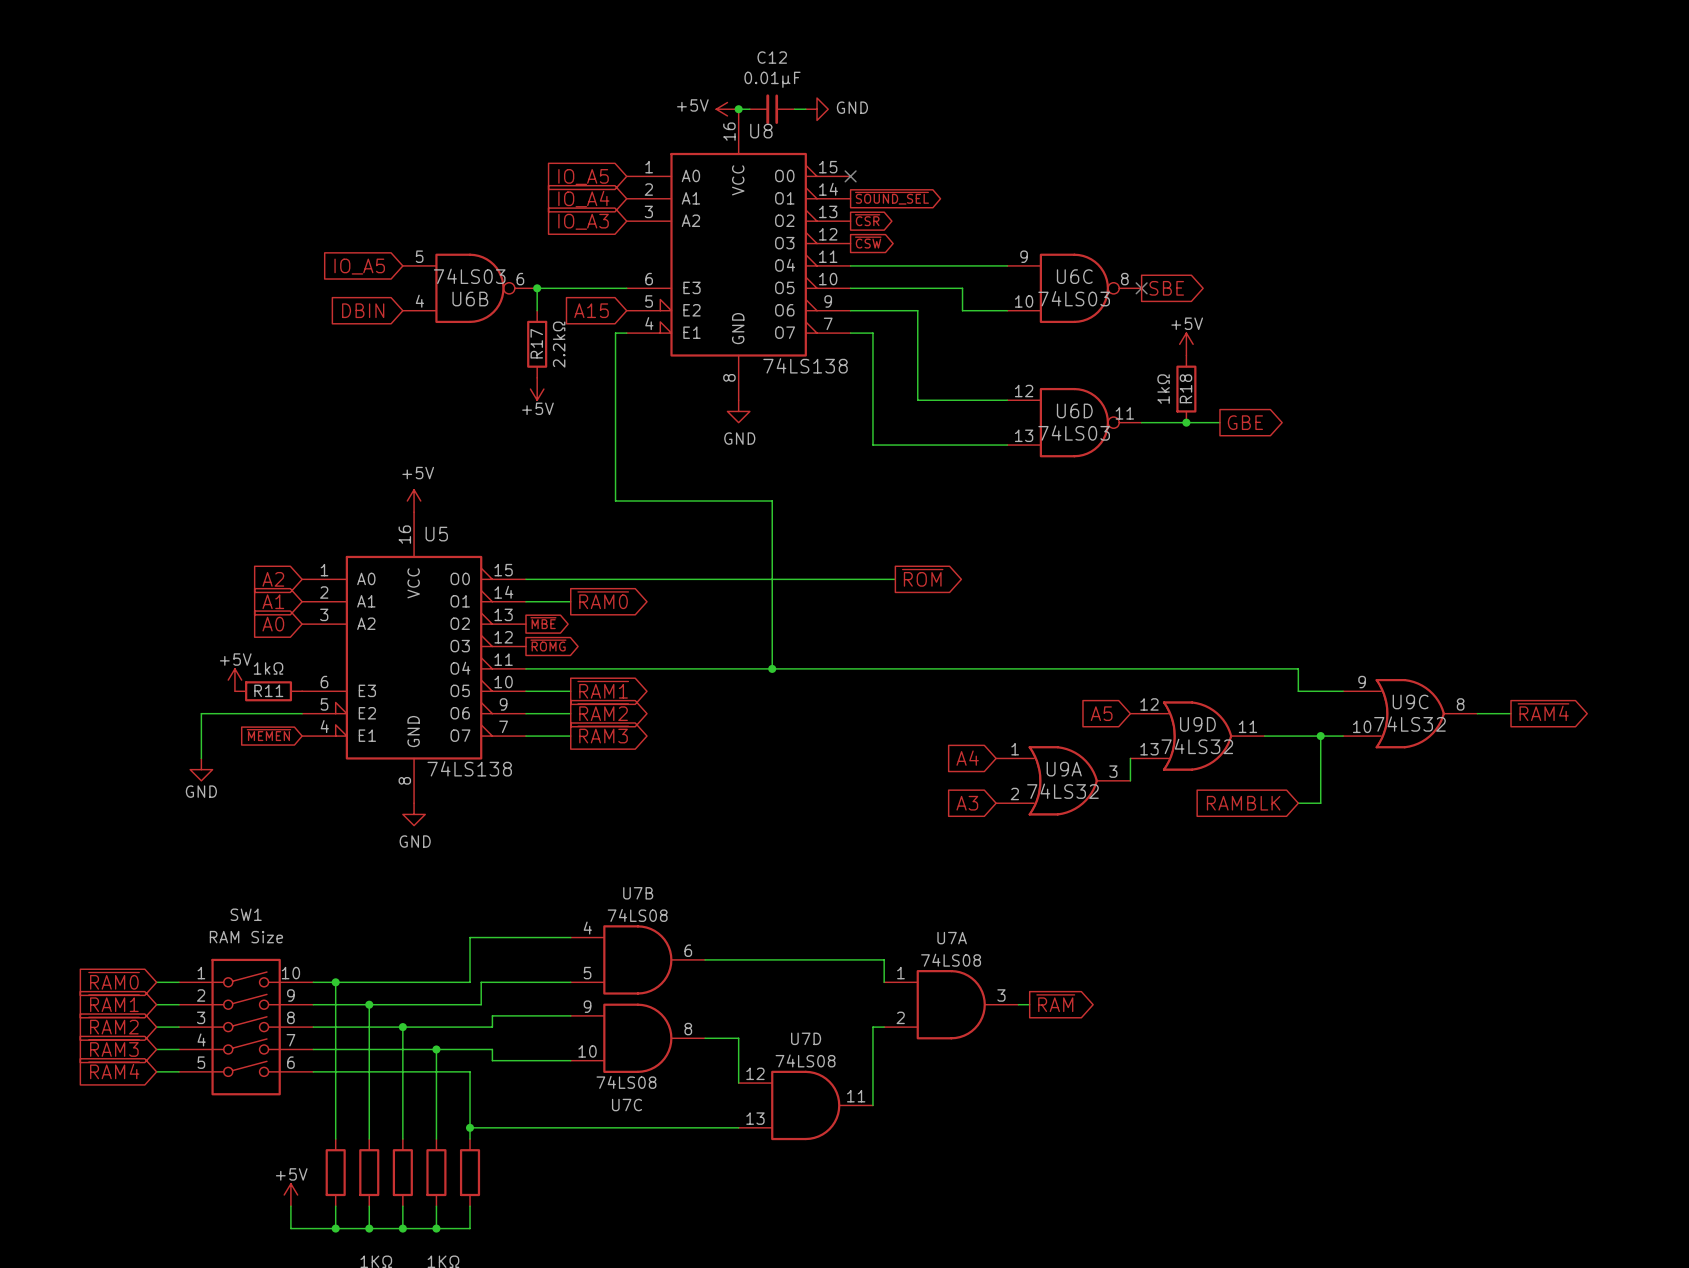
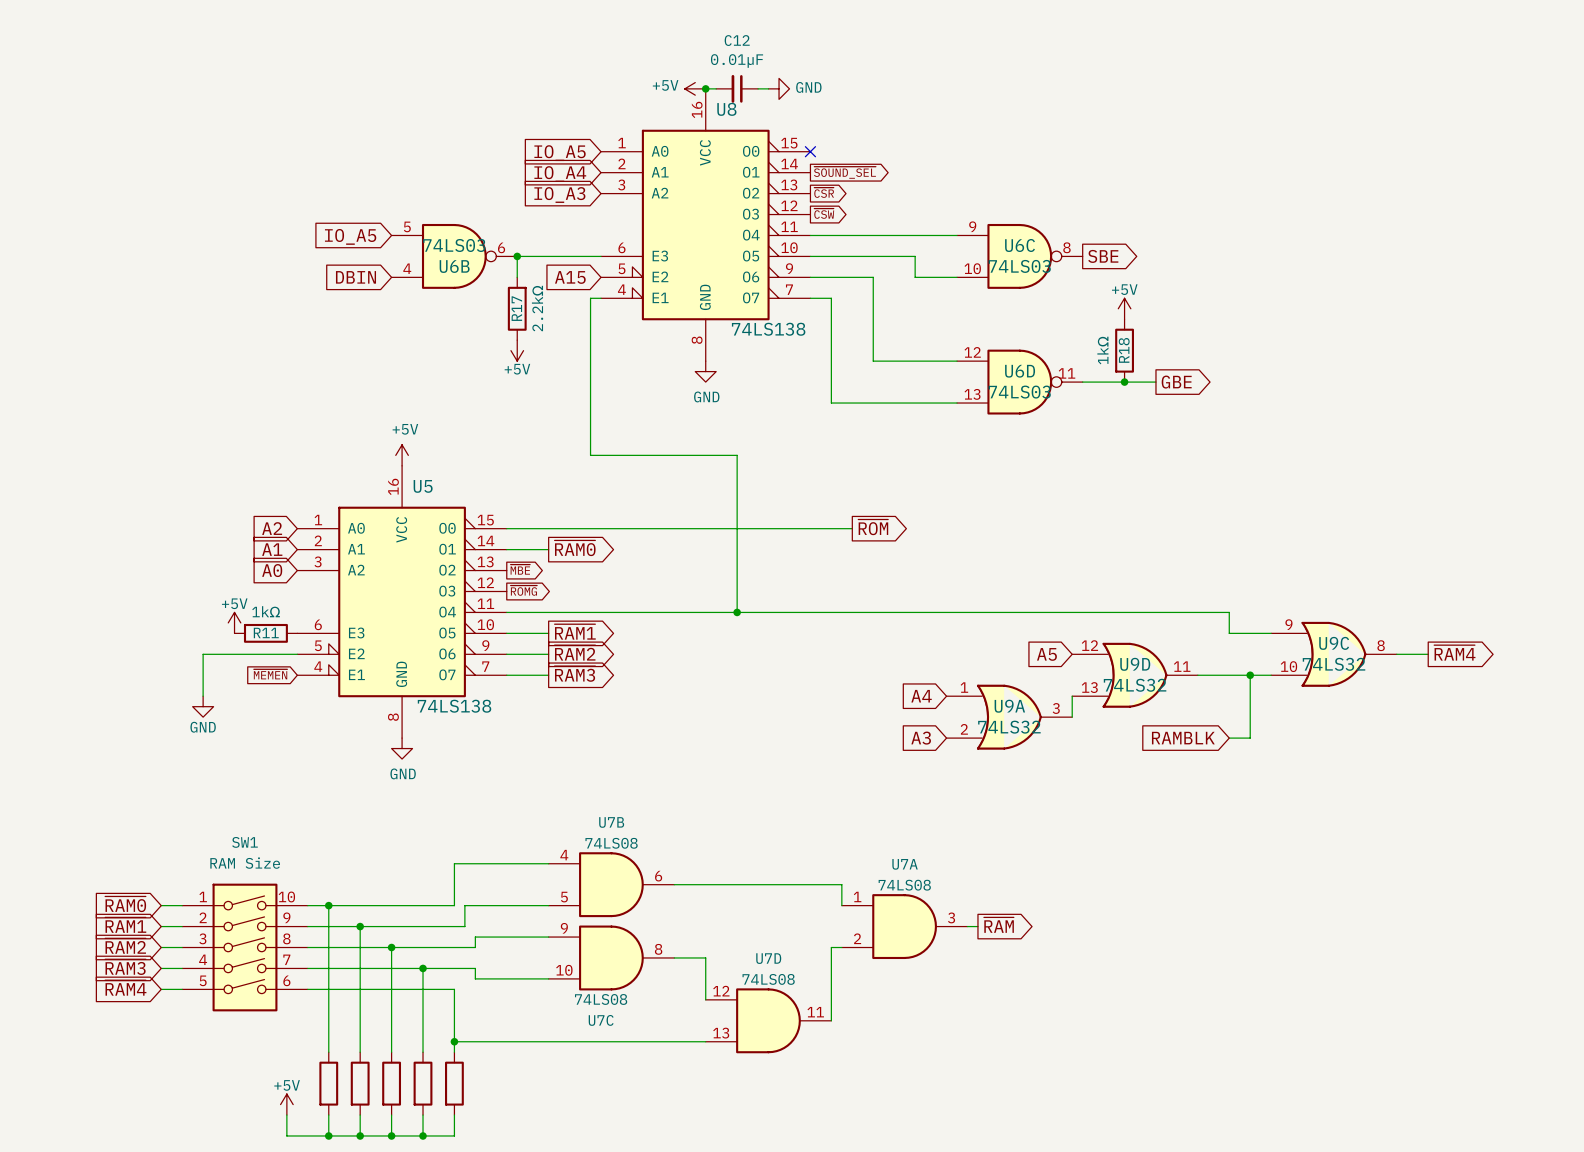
no-connect mark: (1141, 288) -> none

